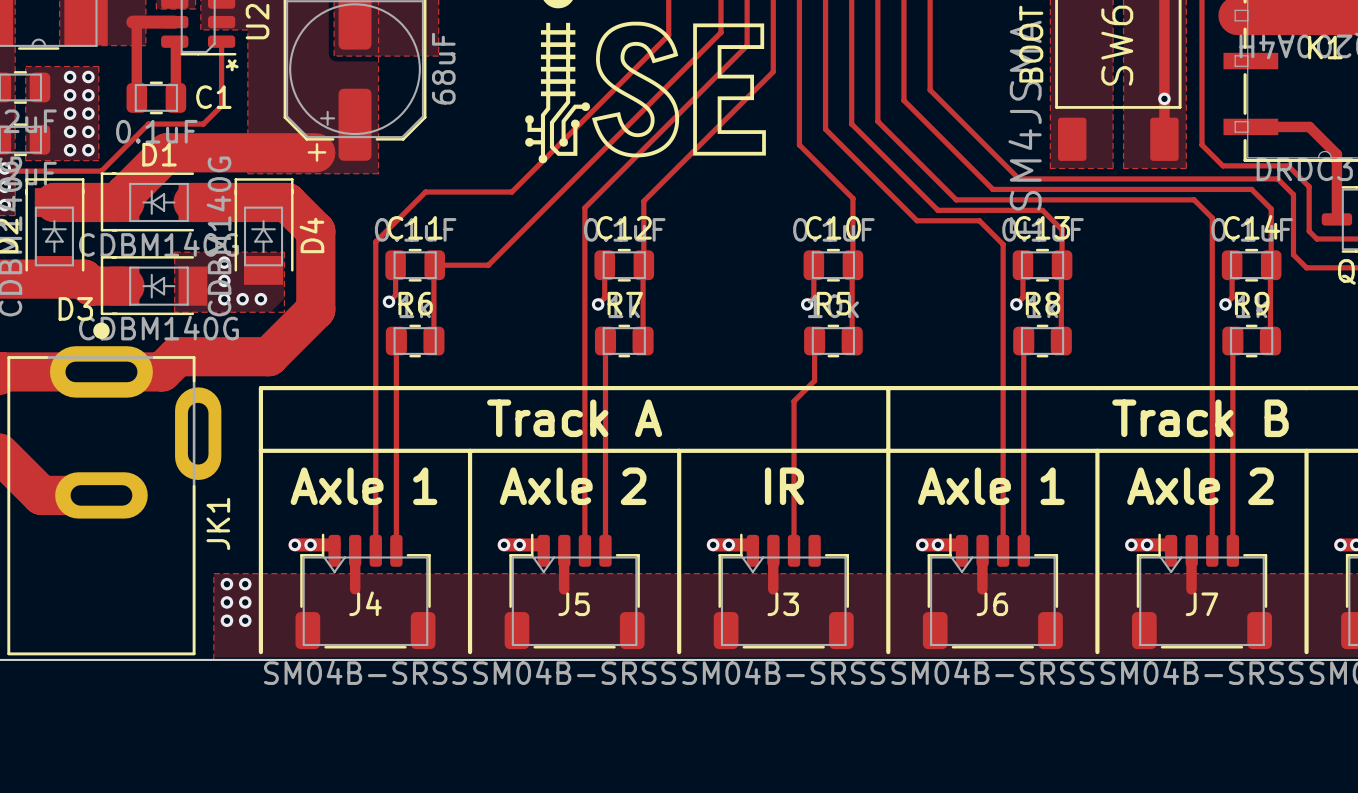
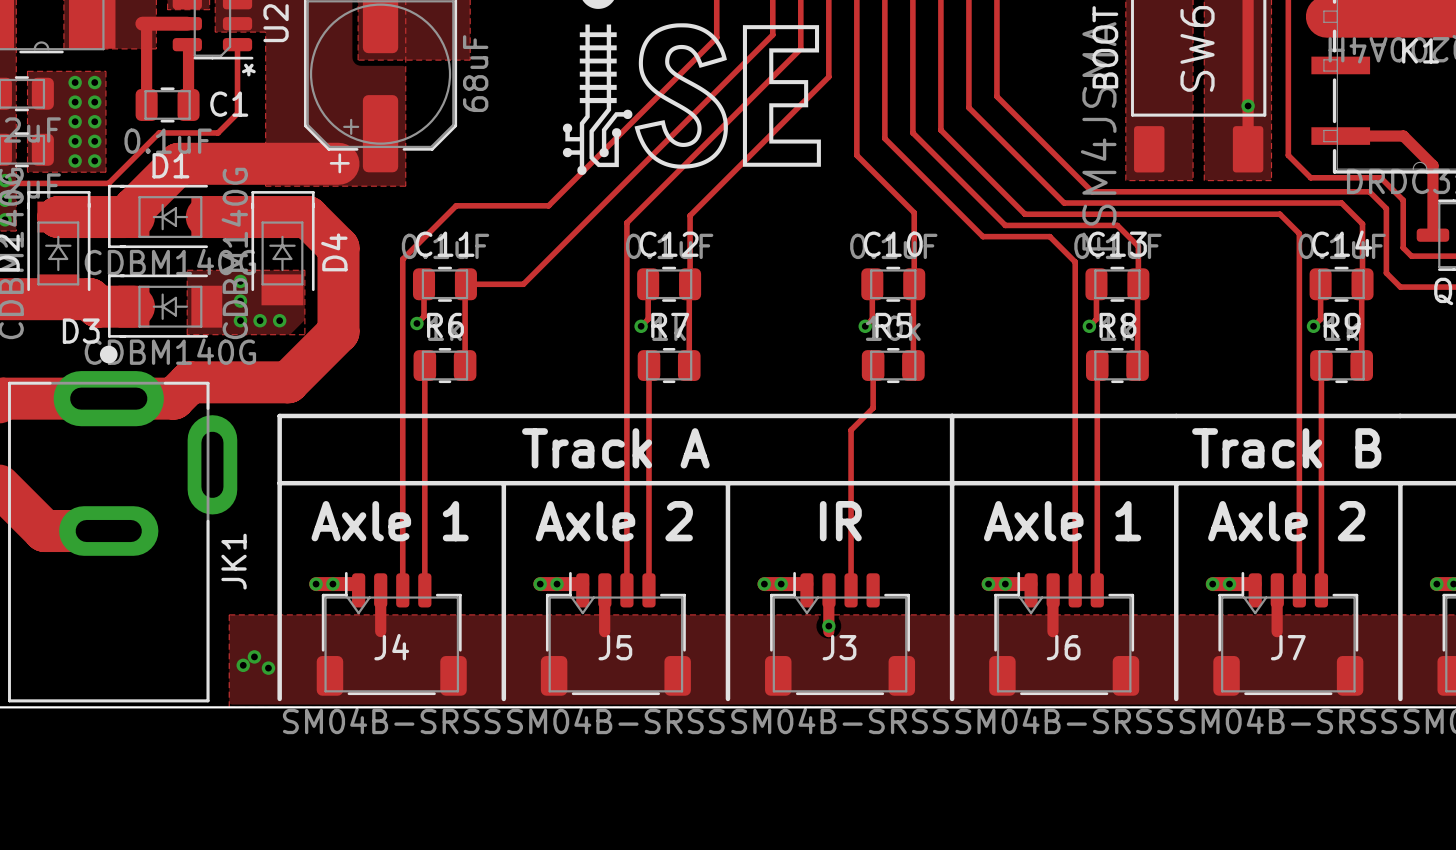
via: (226, 584) -> none
via: (245, 584) -> none
via: none -> (828, 626)
via: (226, 602) -> none
via: (245, 602) -> none
via: none -> (254, 656)
via: (245, 620) -> none
via: none -> (268, 668)

